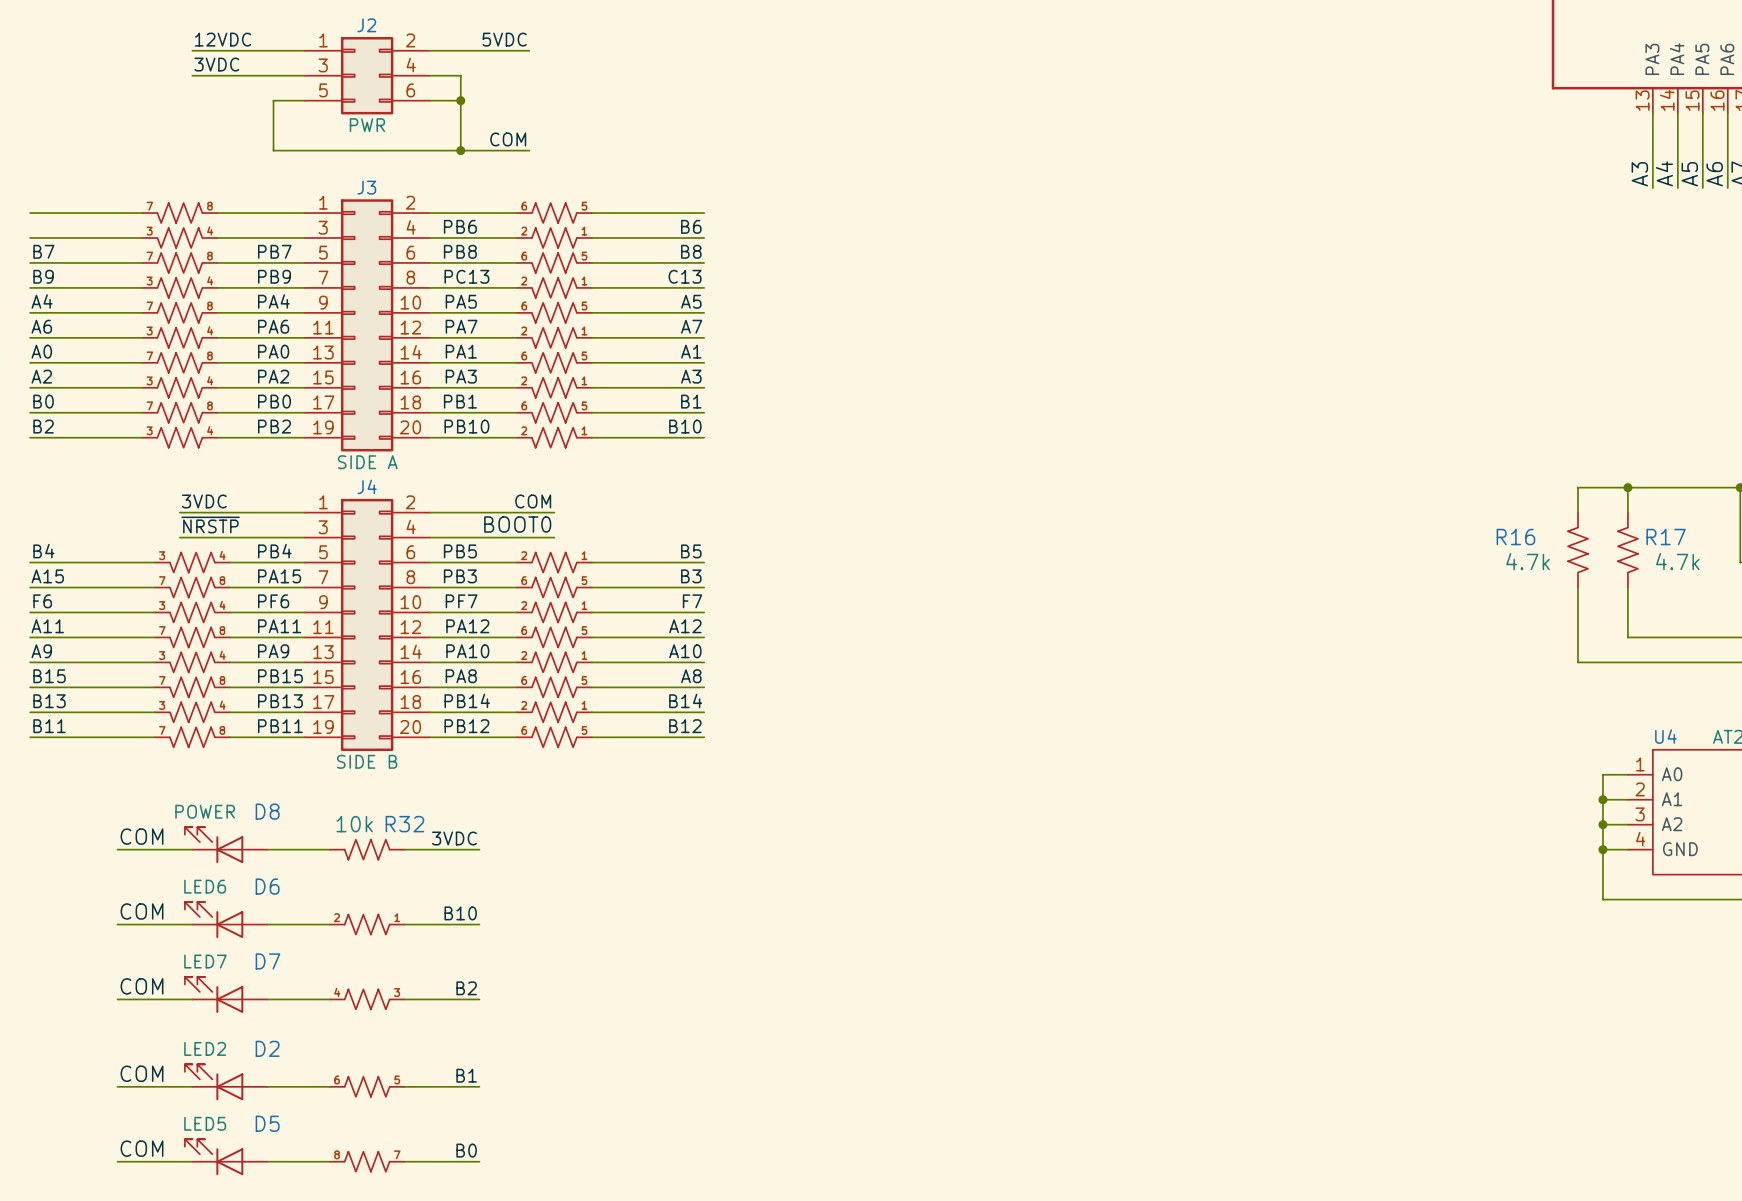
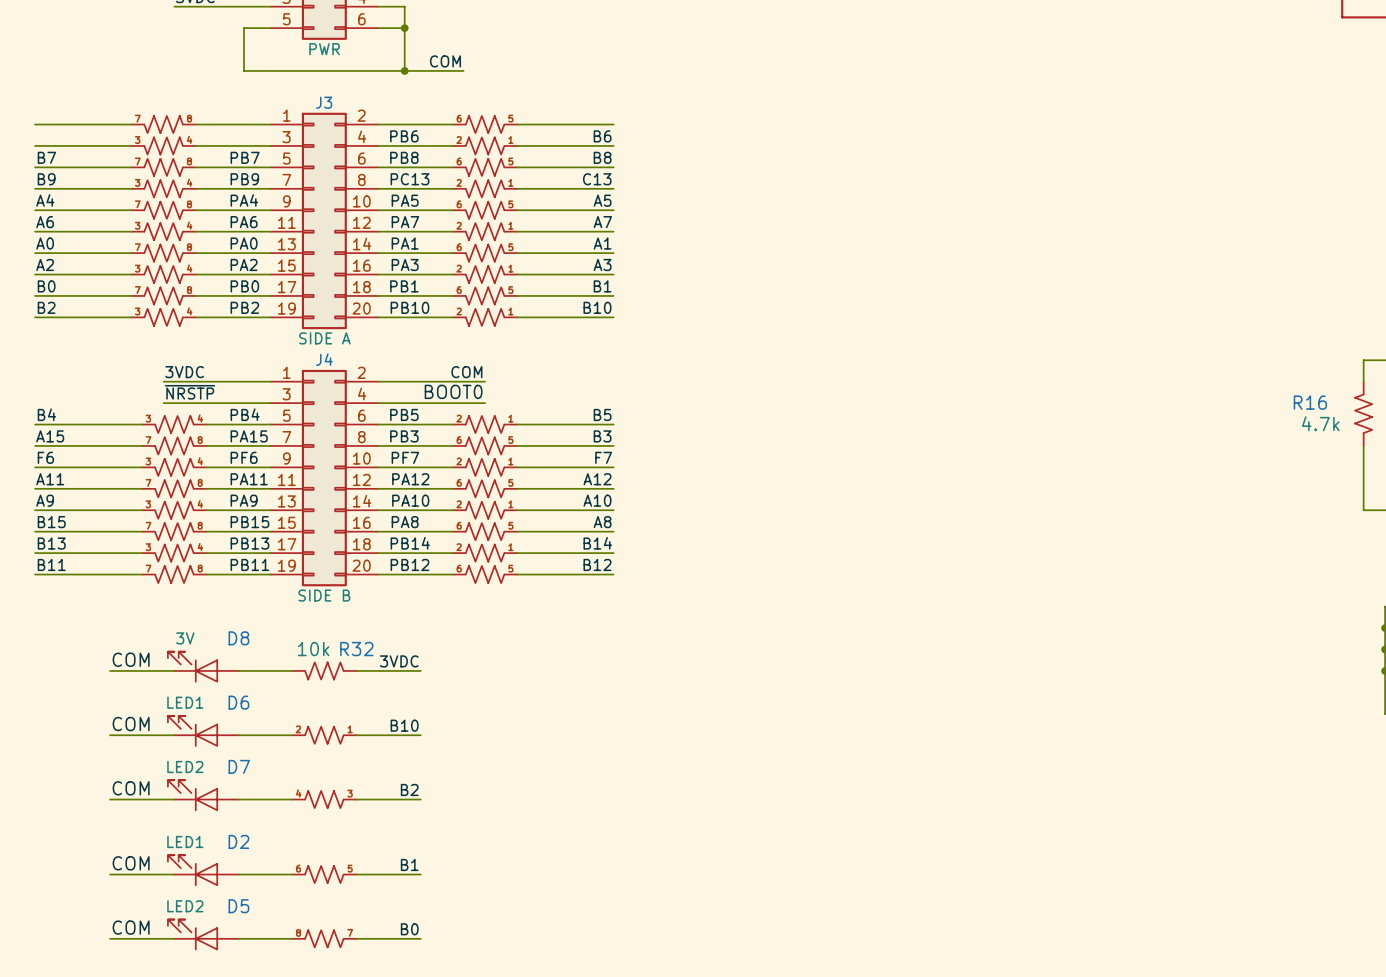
D8 value: POWER (205, 811) -> 3V (185, 638)
D6 value: LED6 (205, 886) -> LED1 (185, 702)
D7 value: LED7 (205, 961) -> LED2 (185, 766)
D2 value: LED2 (205, 1048) -> LED1 (185, 841)
D5 value: LED5 (205, 1123) -> LED2 (185, 906)

